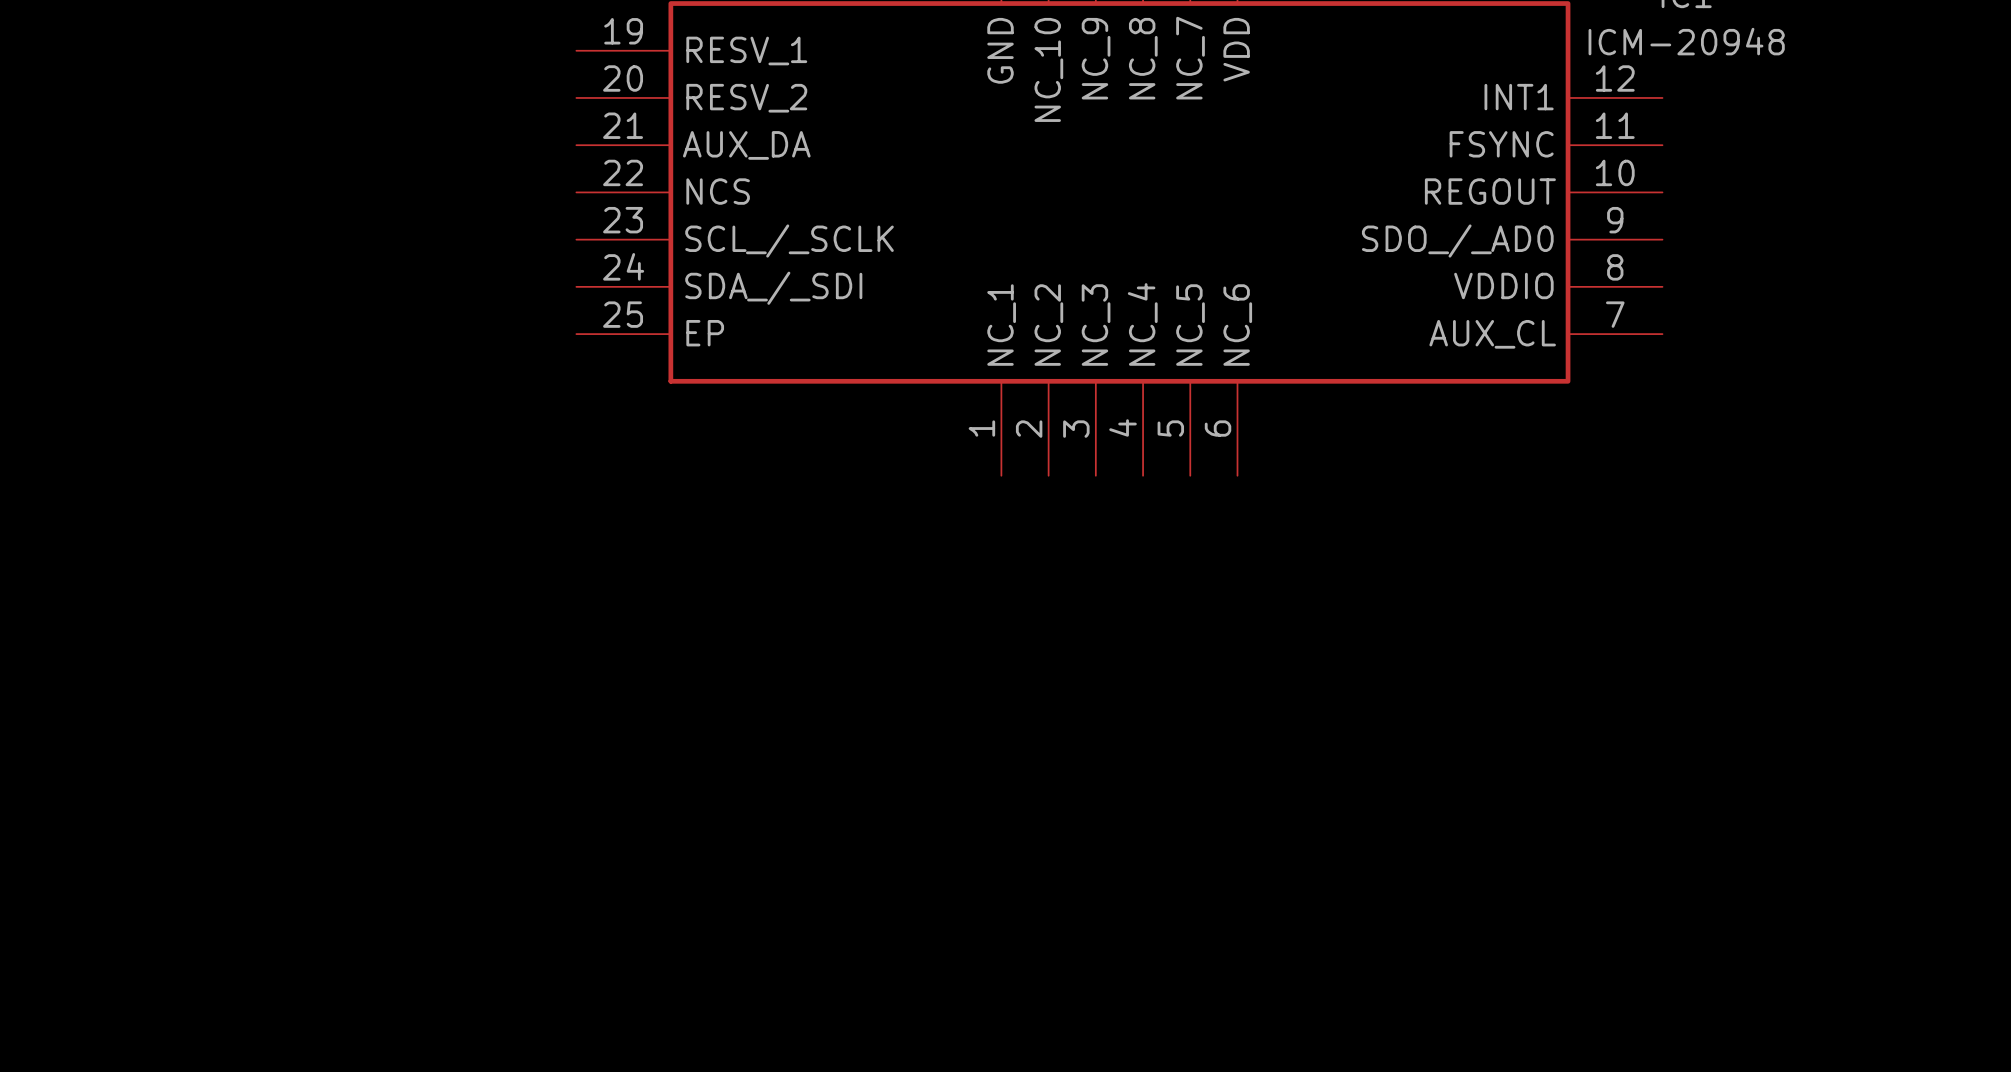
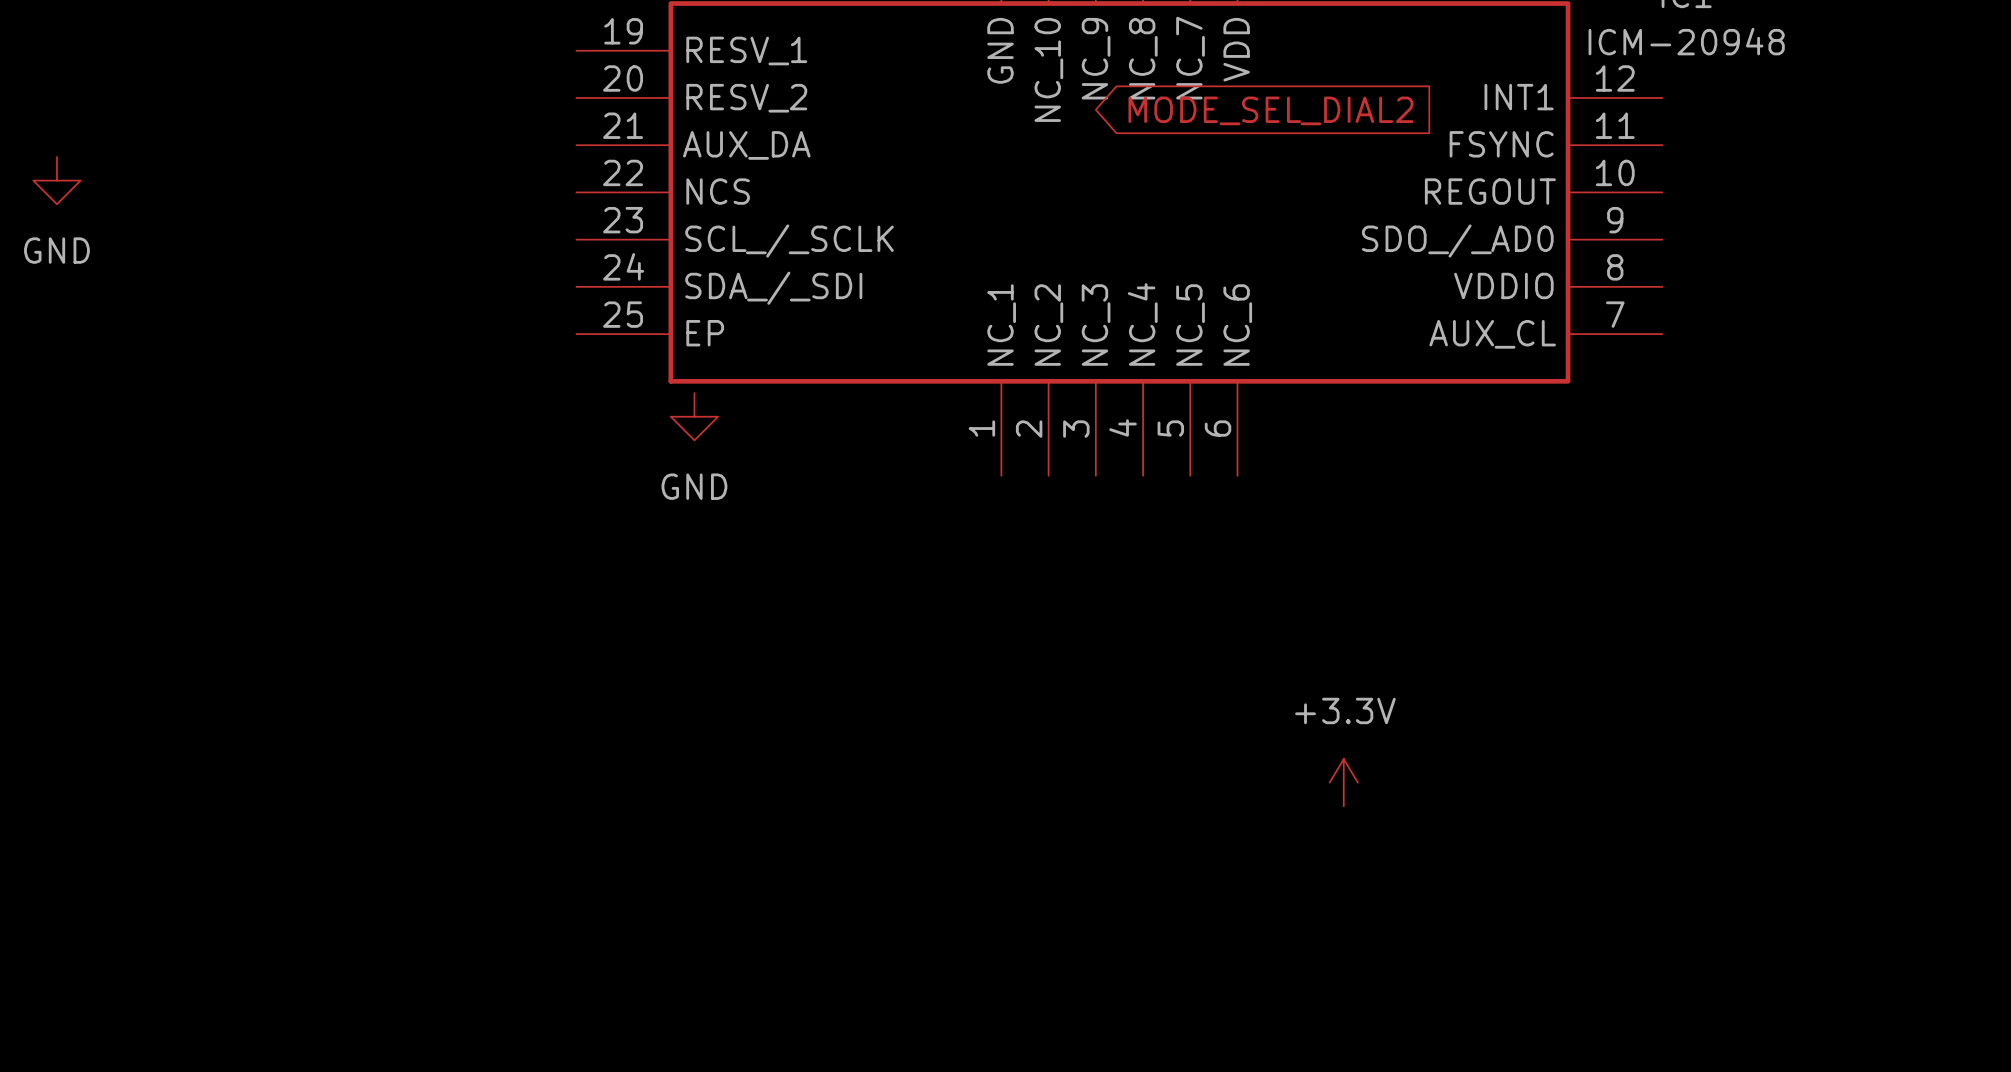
global label: none -> MODE_SEL_DIAL2 (1270, 110)
power symbol: none -> GND (56, 180)
power symbol: none -> GND (694, 416)
power symbol: none -> +3.3V (1343, 782)

